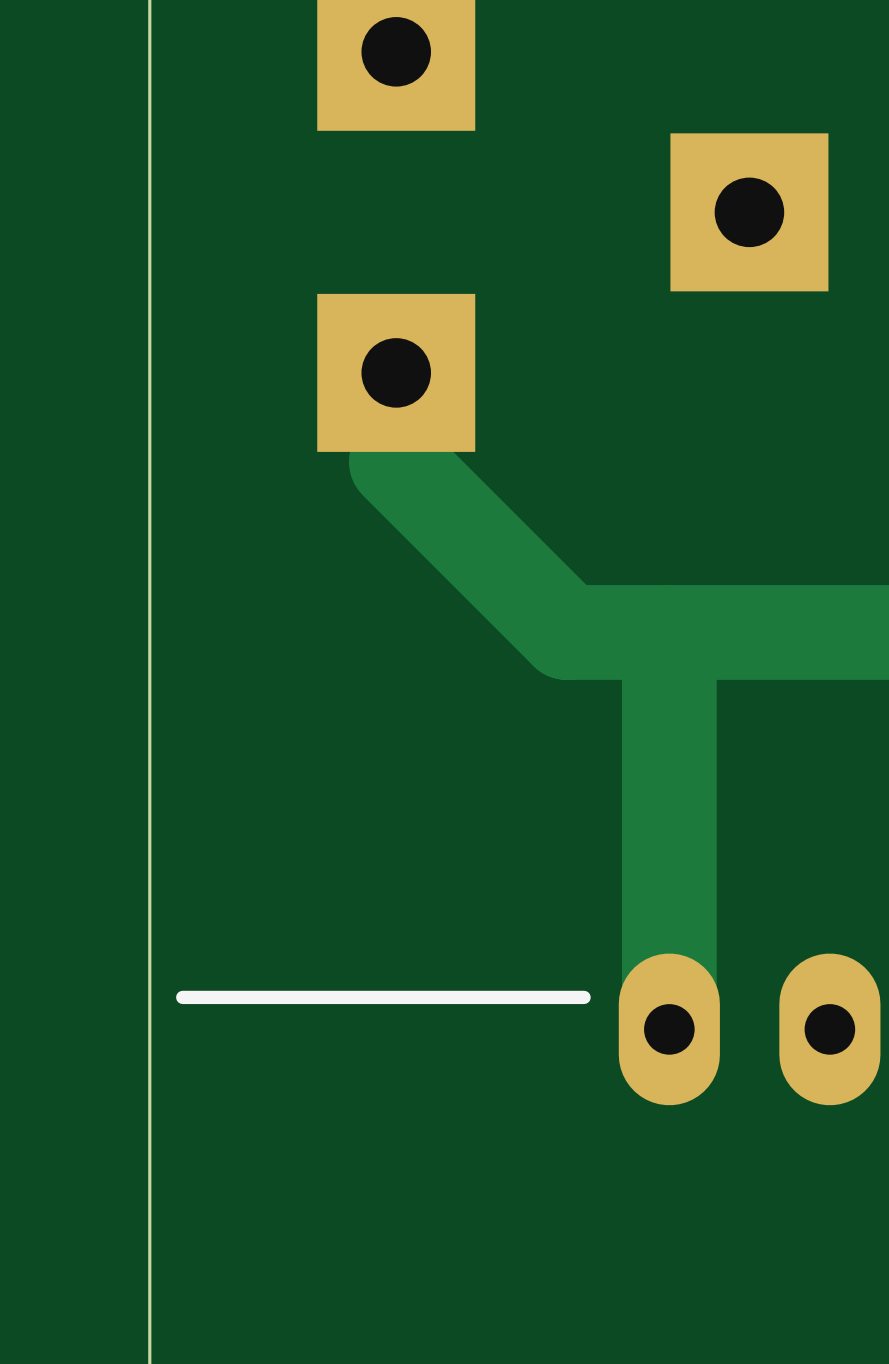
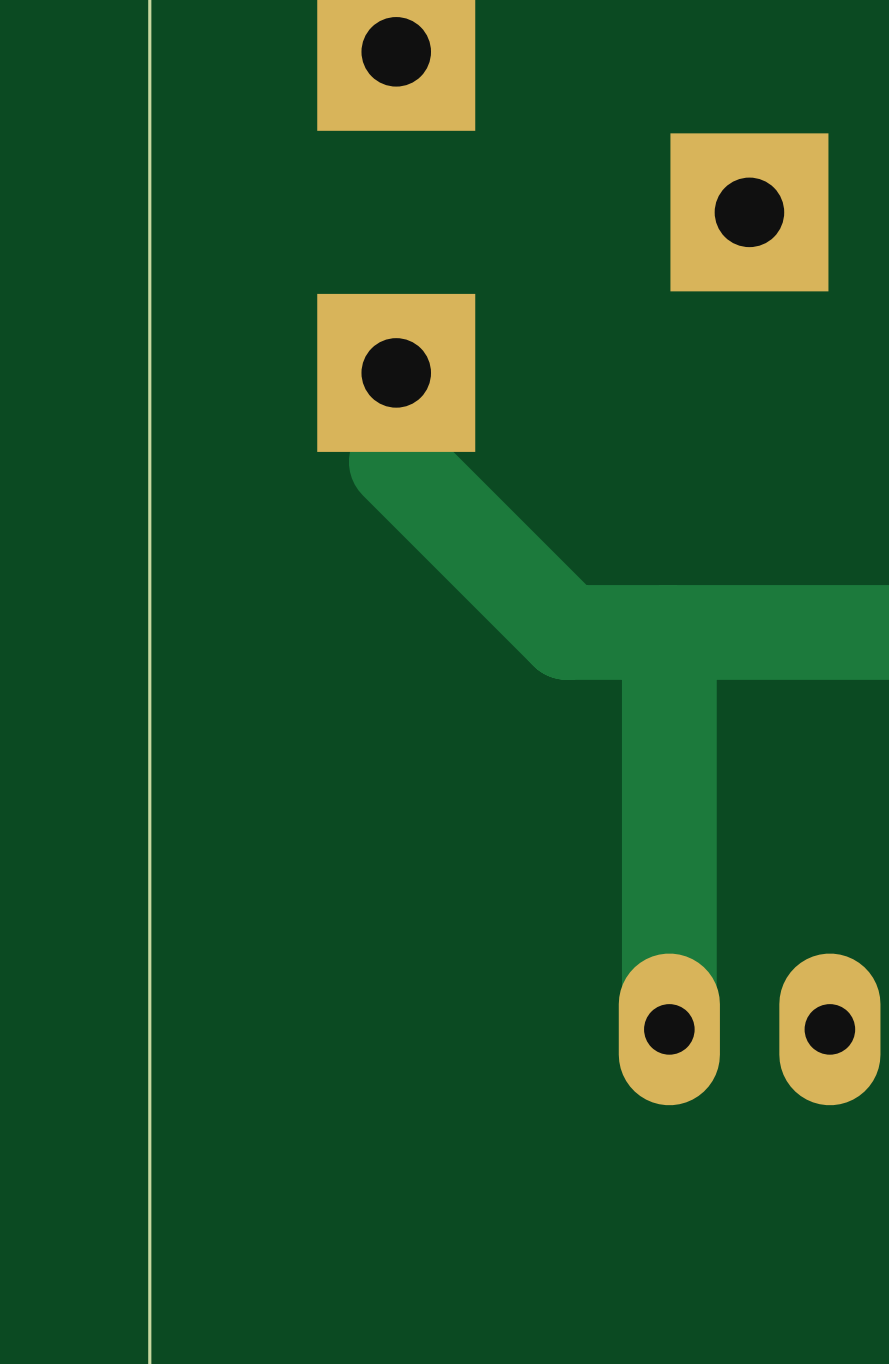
line: (182, 997) (584, 997) -> none

